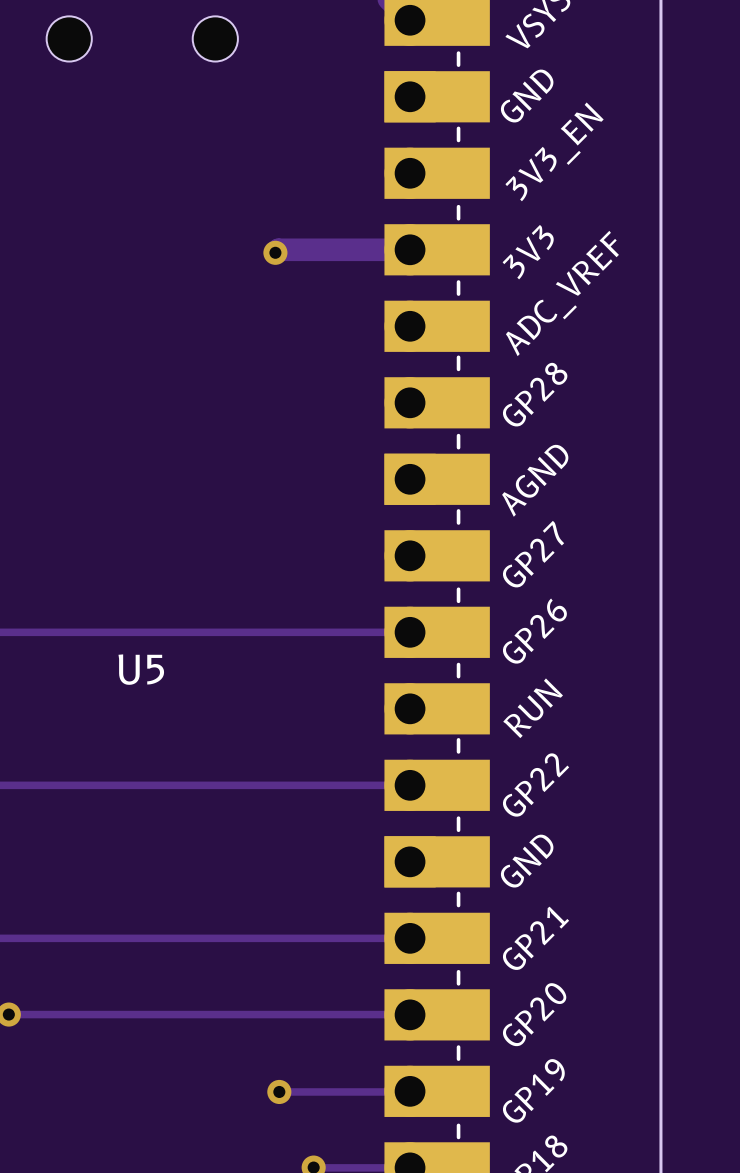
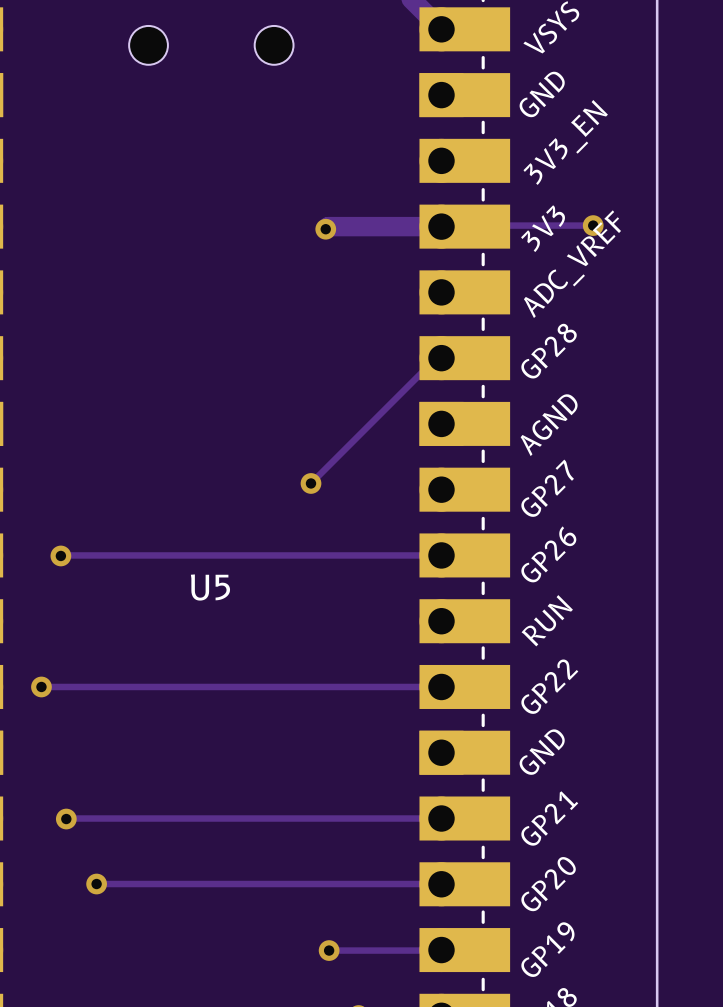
track: none -> (593, 225) (441, 226)
via: none -> (593, 225)
track: none -> (441, 358) (436, 358) (311, 483)
via: none -> (311, 483)

